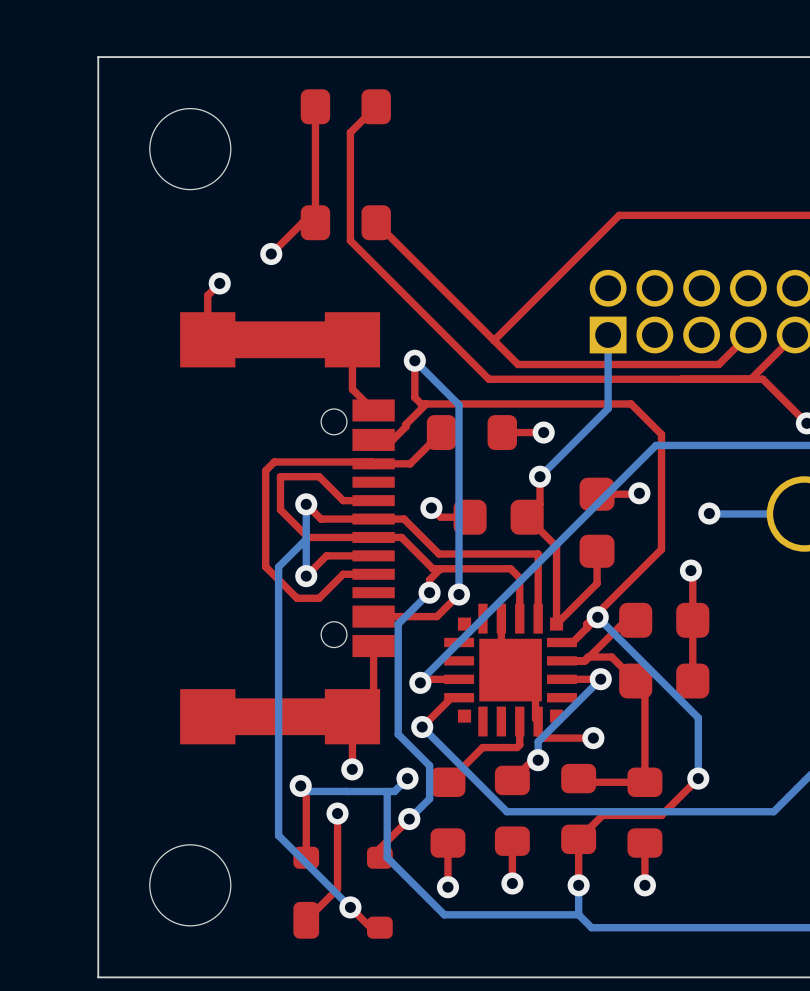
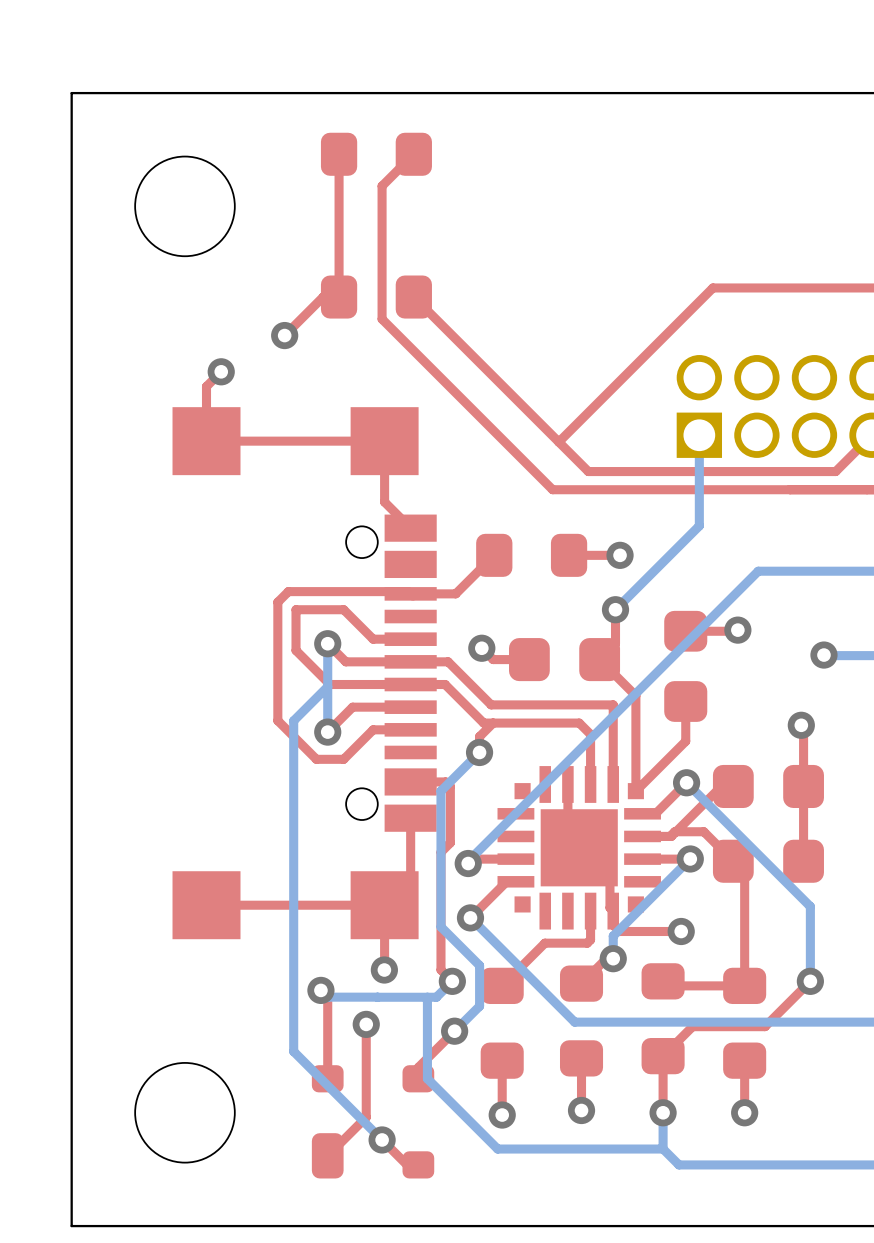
top track width: thick (352, 339) (207, 339) -> thin (384, 441) (206, 441)
top track: (414, 360) (414, 397) (421, 403) (631, 403) (661, 434) (661, 549) (586, 624) (586, 628) -> none
bottom track: (414, 360) (459, 404) (459, 594) -> none
via: (414, 360) -> none
top track: (426, 403) (392, 439) (373, 439) -> none
top track: (459, 594) (436, 616) (402, 616) -> (452, 981) (440, 969) (440, 852) (450, 842) (450, 786) (445, 781)
via: (459, 594) -> none
top track width: thick (352, 716) (207, 716) -> thin (384, 905) (206, 905)

